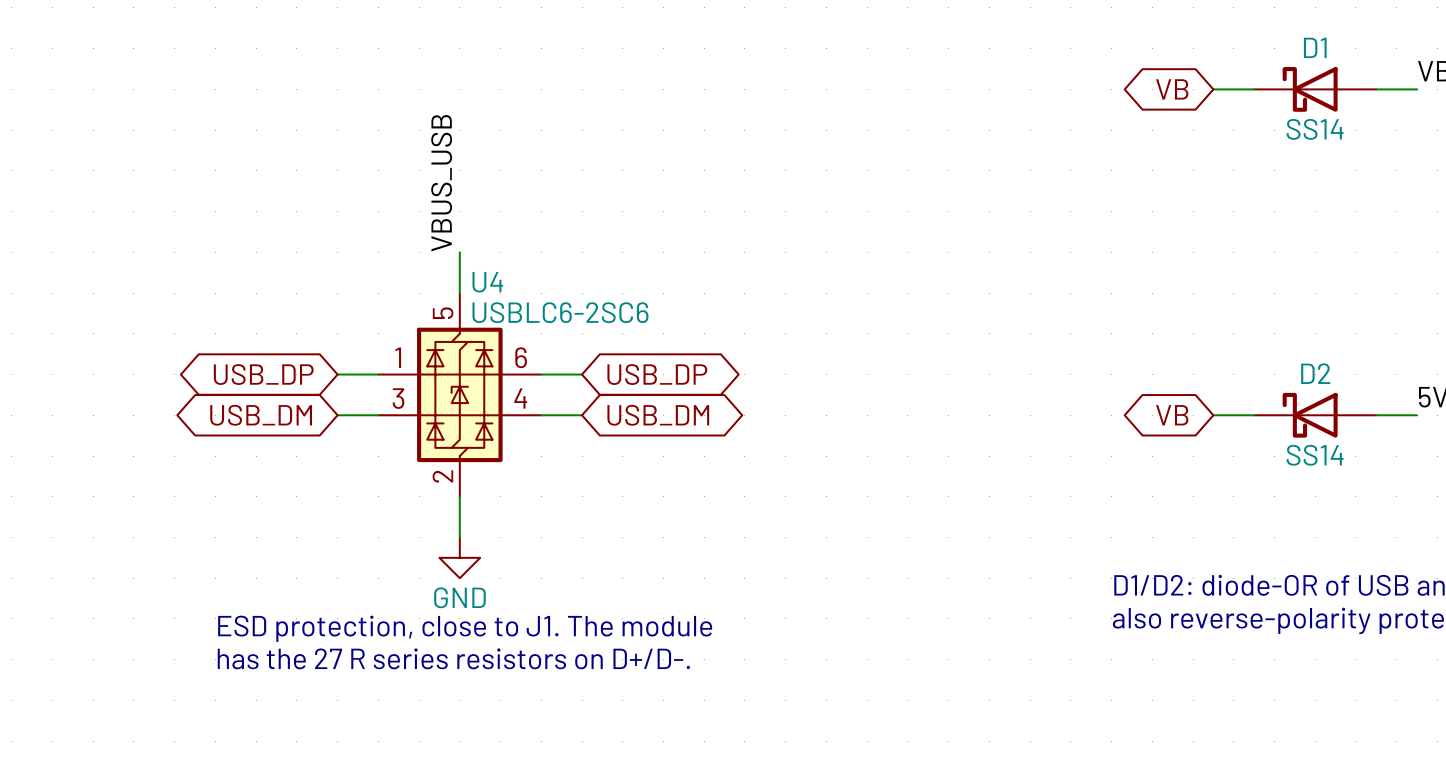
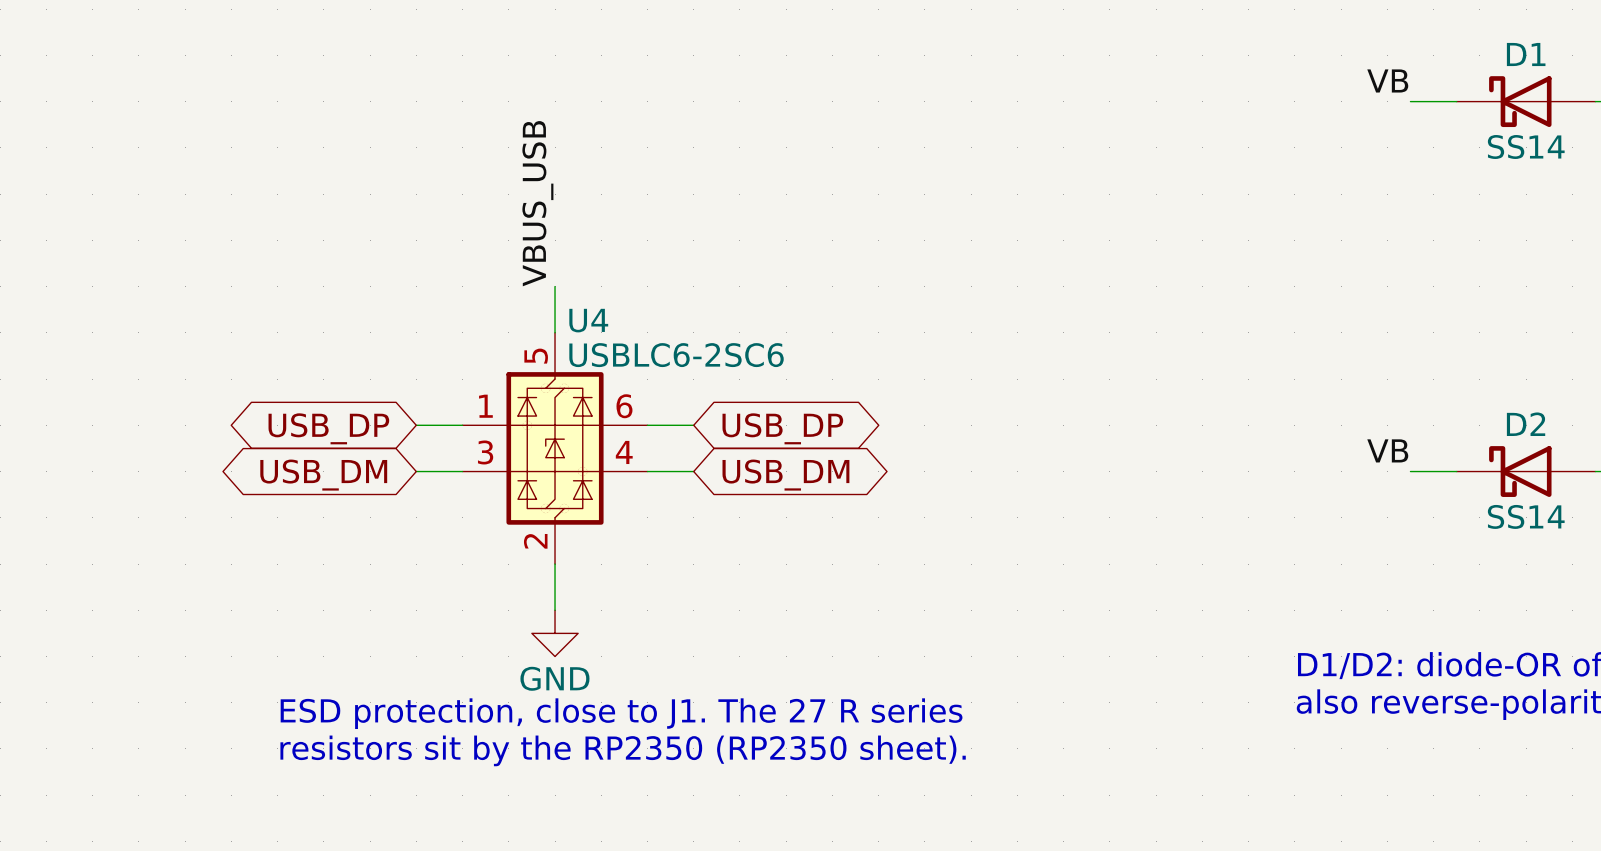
label: none -> VB (1387, 80)
global label: VB (1172, 89) -> none
label: none -> VB (1387, 450)
global label: VB (1172, 415) -> none
text: ESD protection, close to J1. The module (465, 628) -> ESD protection, close to J1. The 27 R series (621, 713)
text: has the 27 R series resistors on D+/D-. (453, 658) -> resistors sit by the RP2350 (RP2350 sheet). (623, 750)

